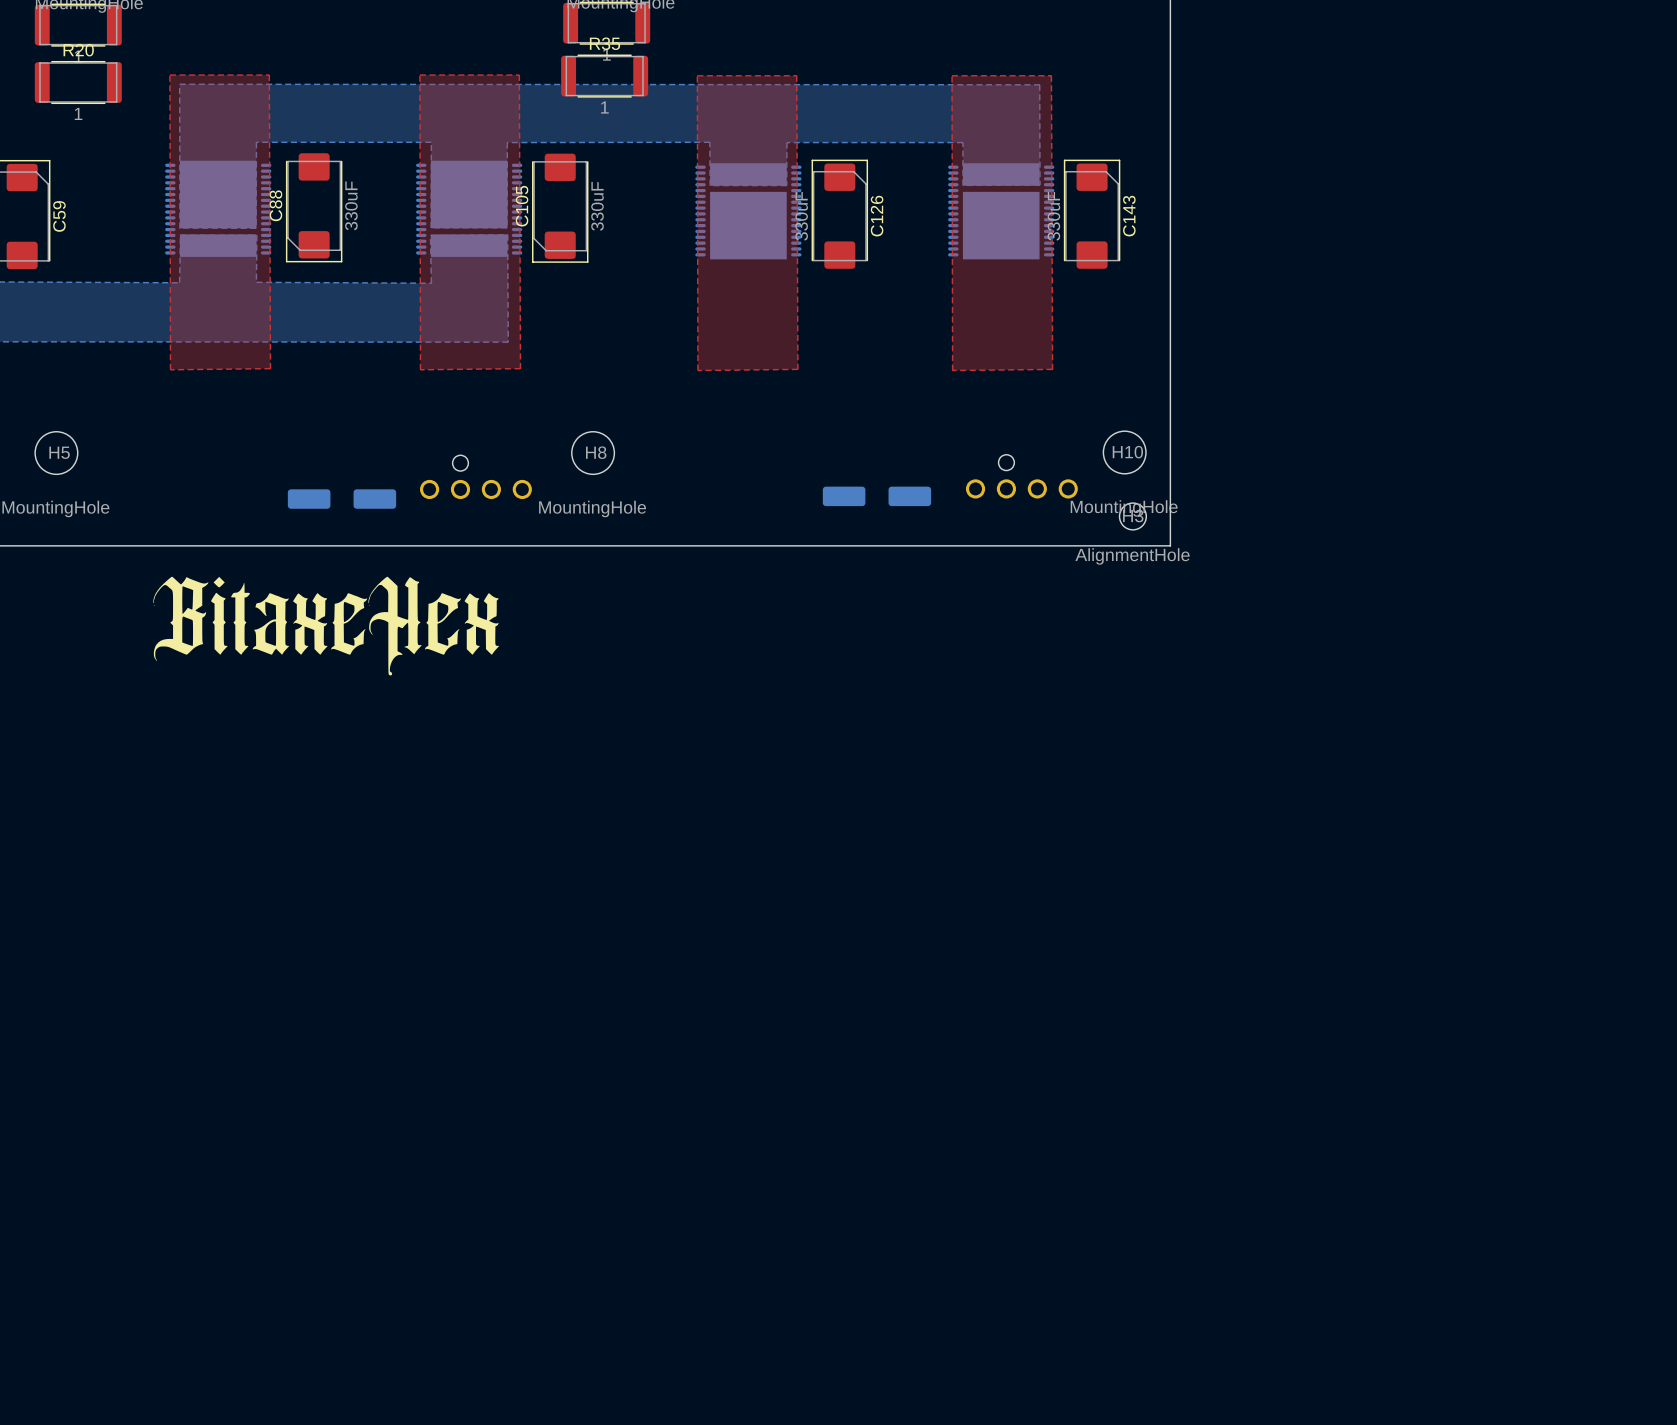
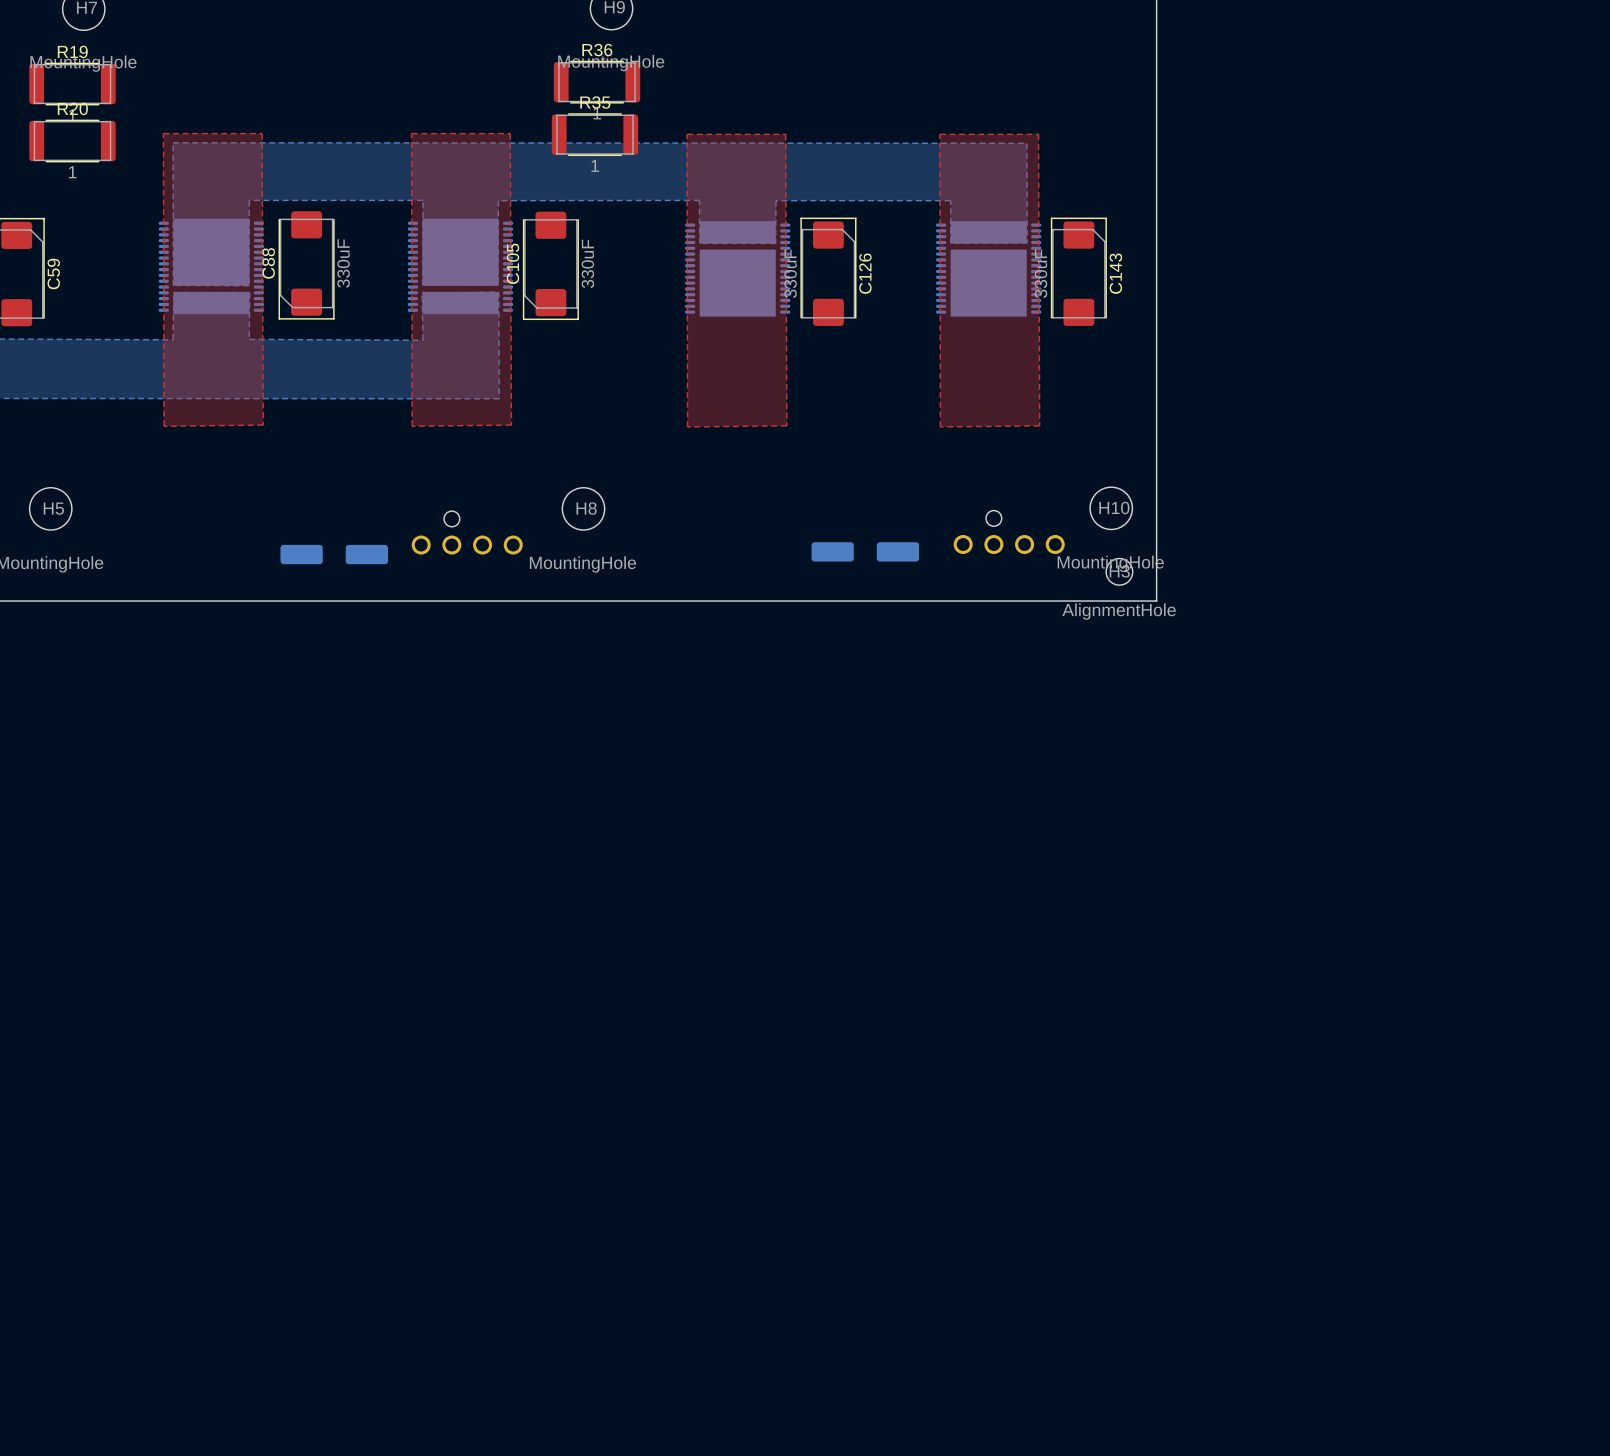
drawing: [153, 576, 500, 676] -> none

